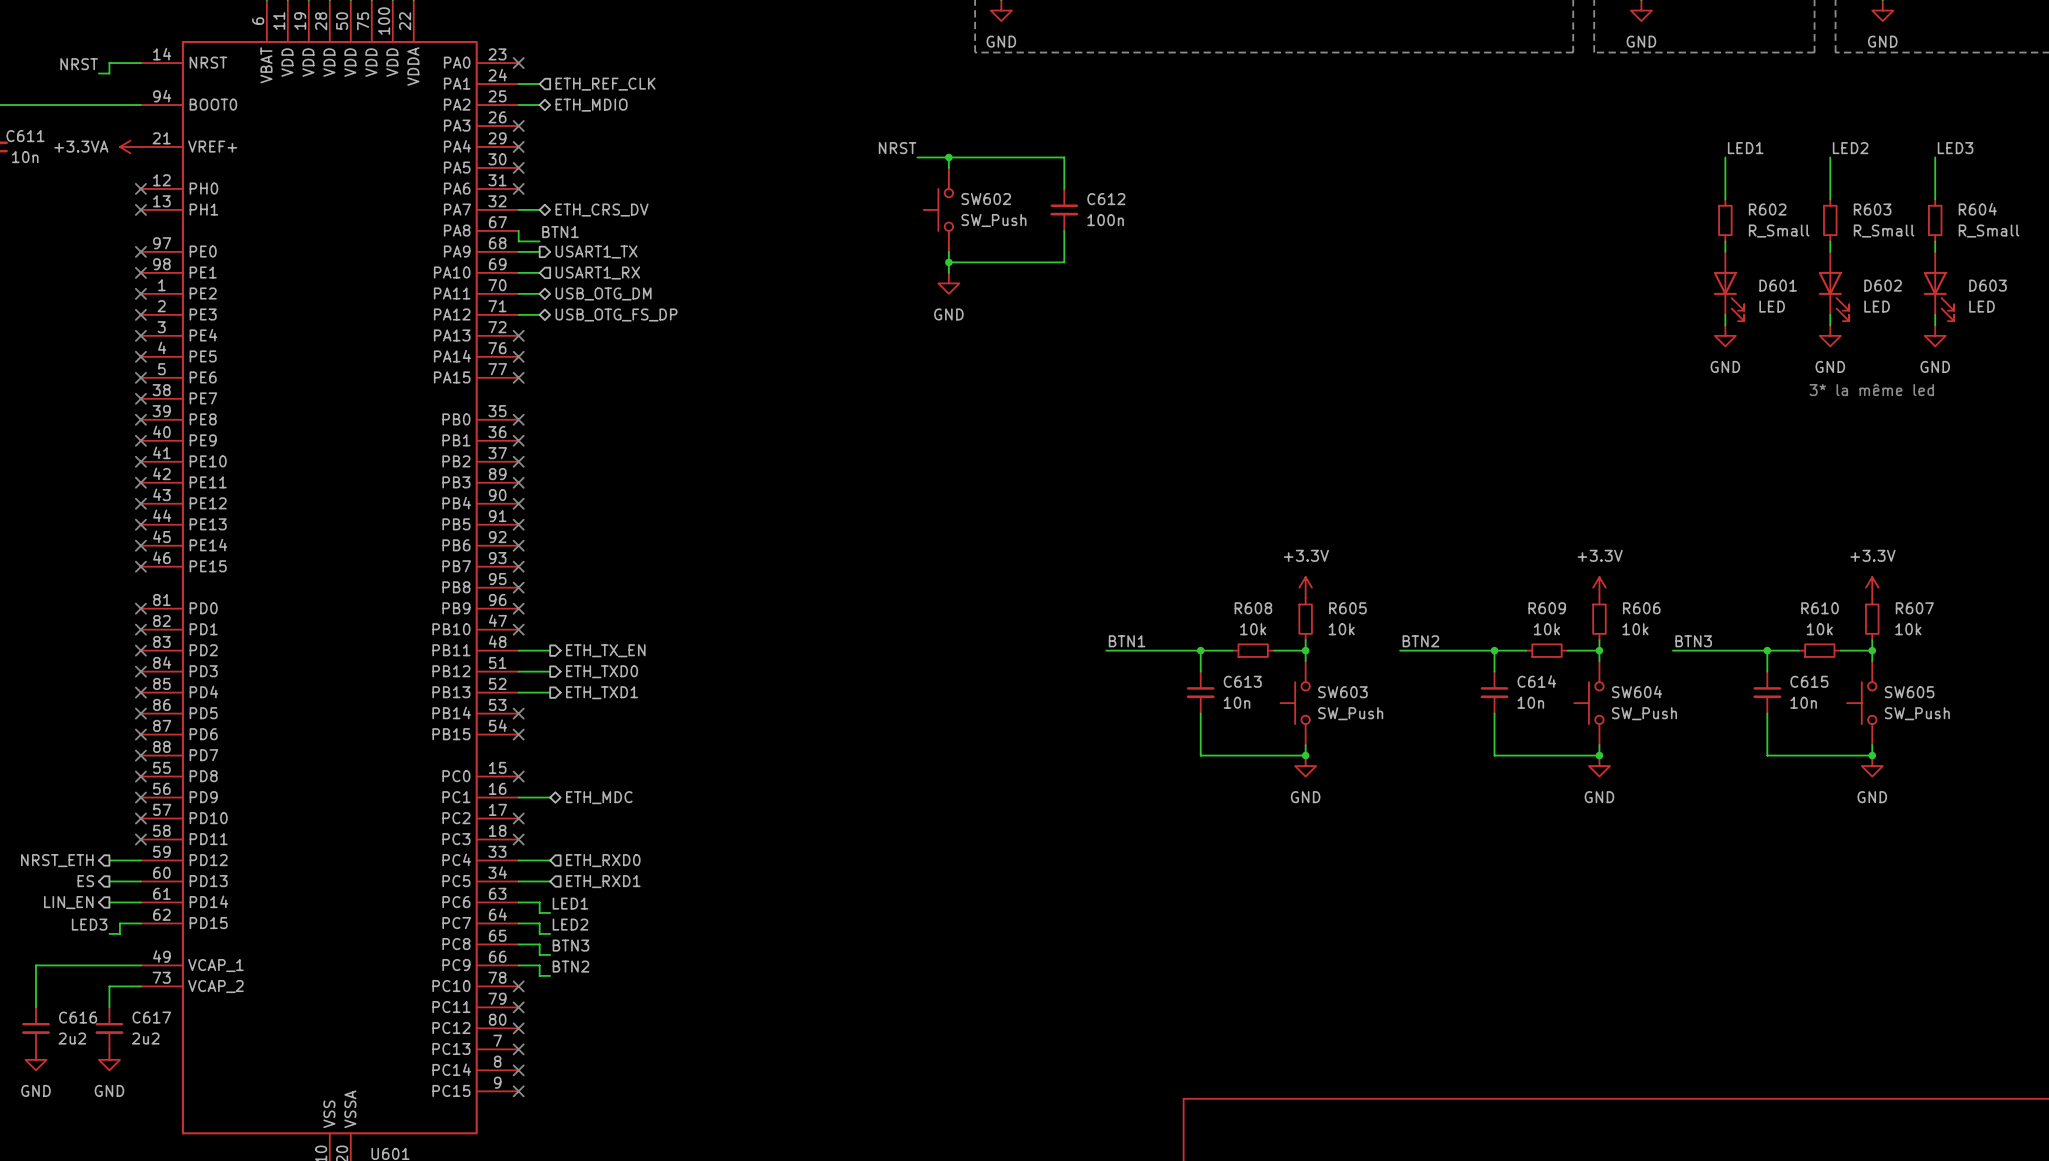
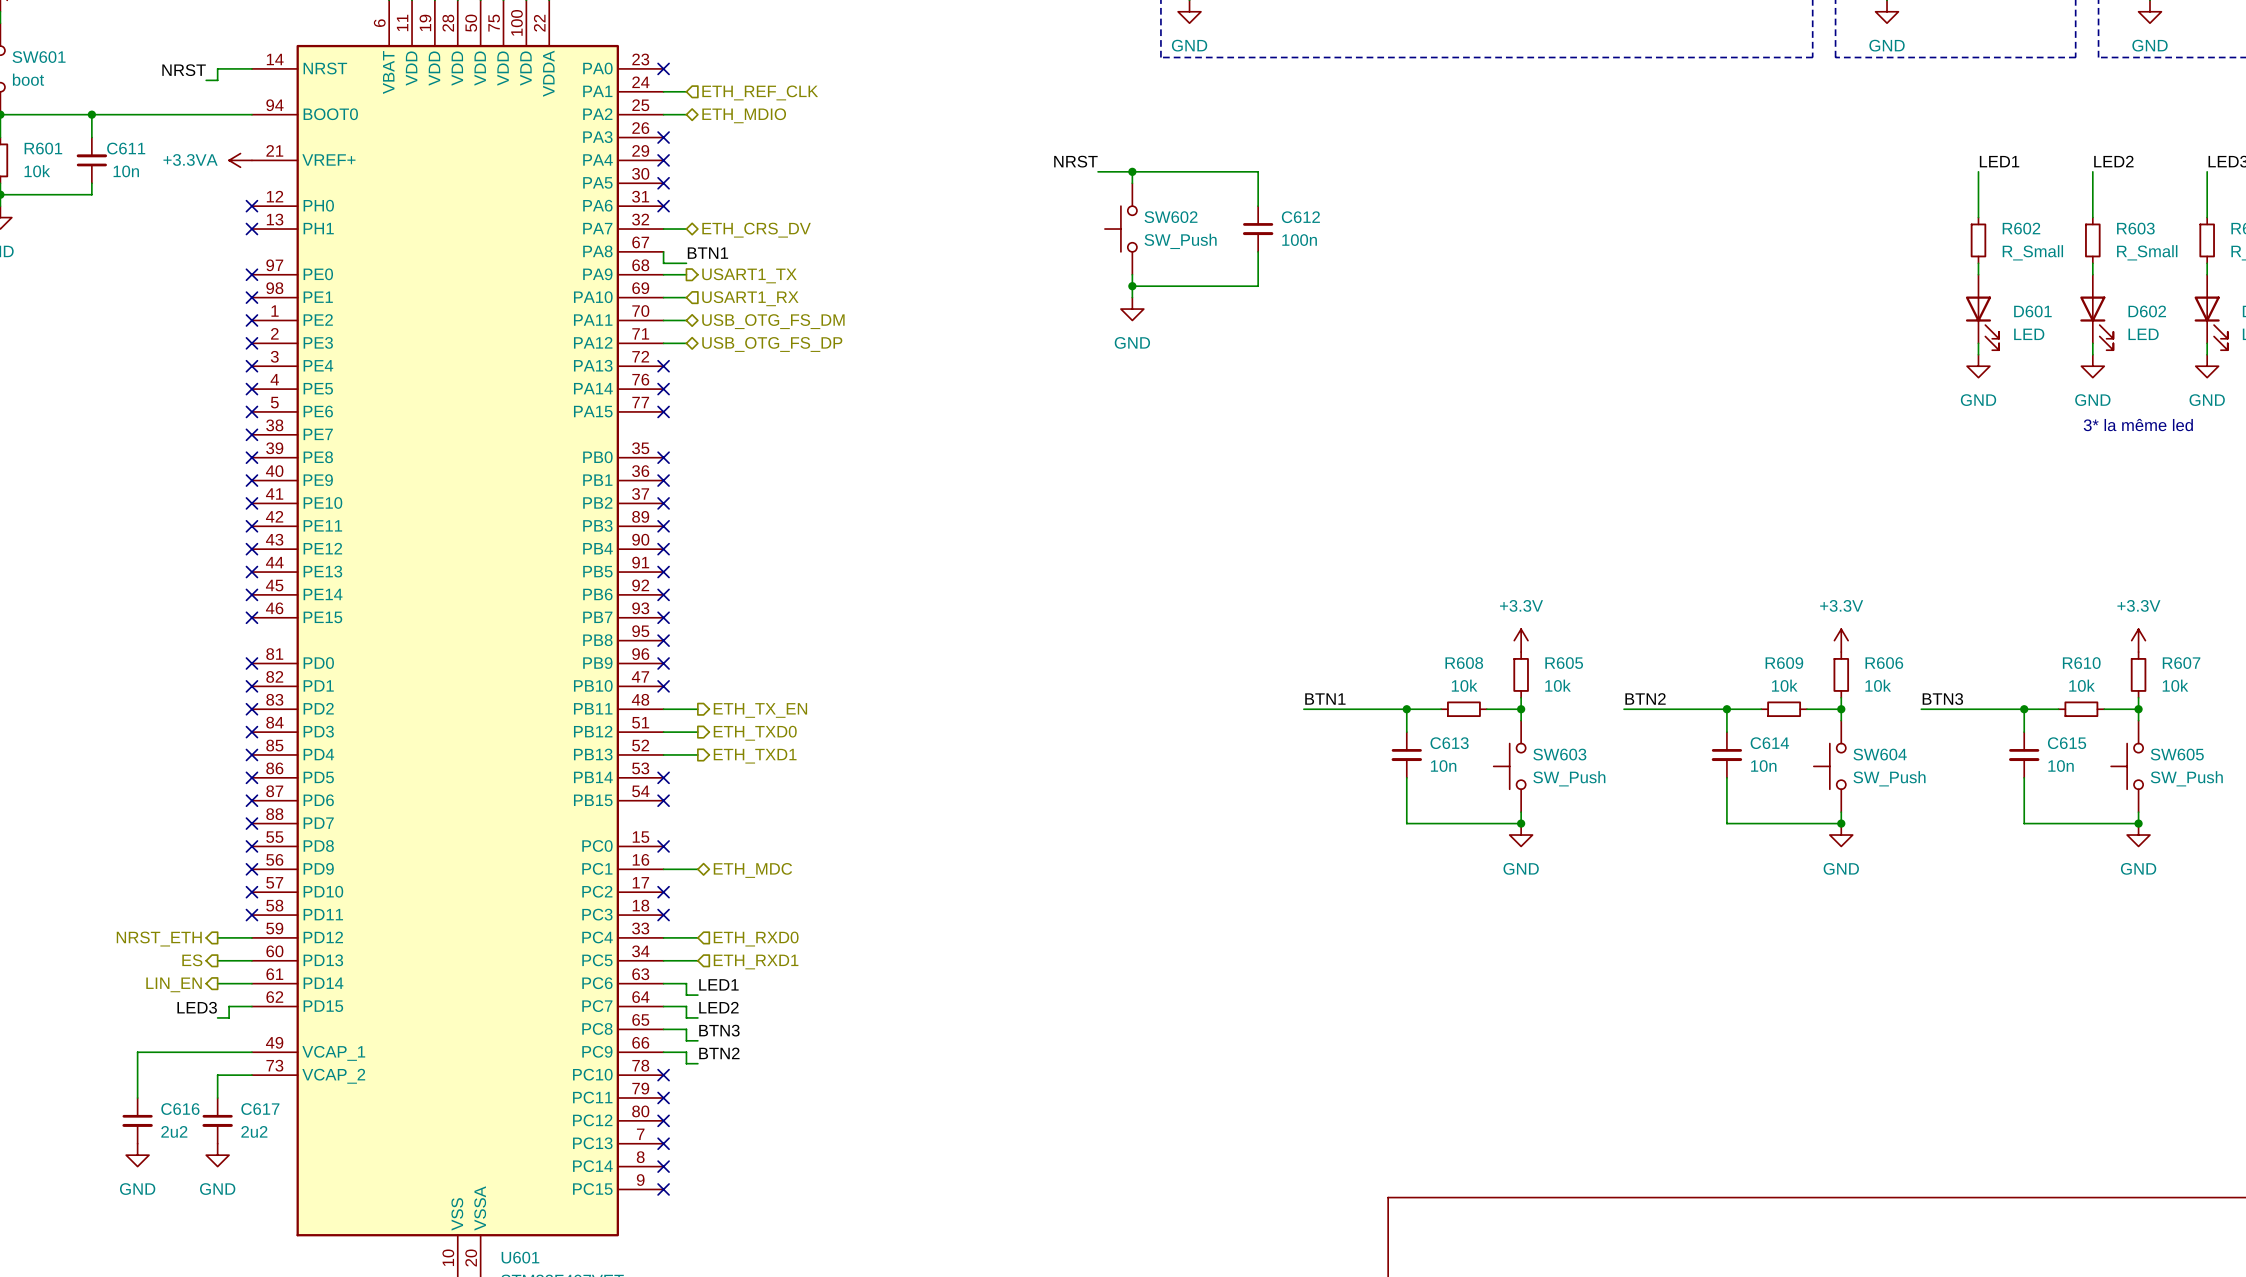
hierarchical label: USB_OTG_DM (603, 293) -> USB_OTG_FS_DM (773, 321)

